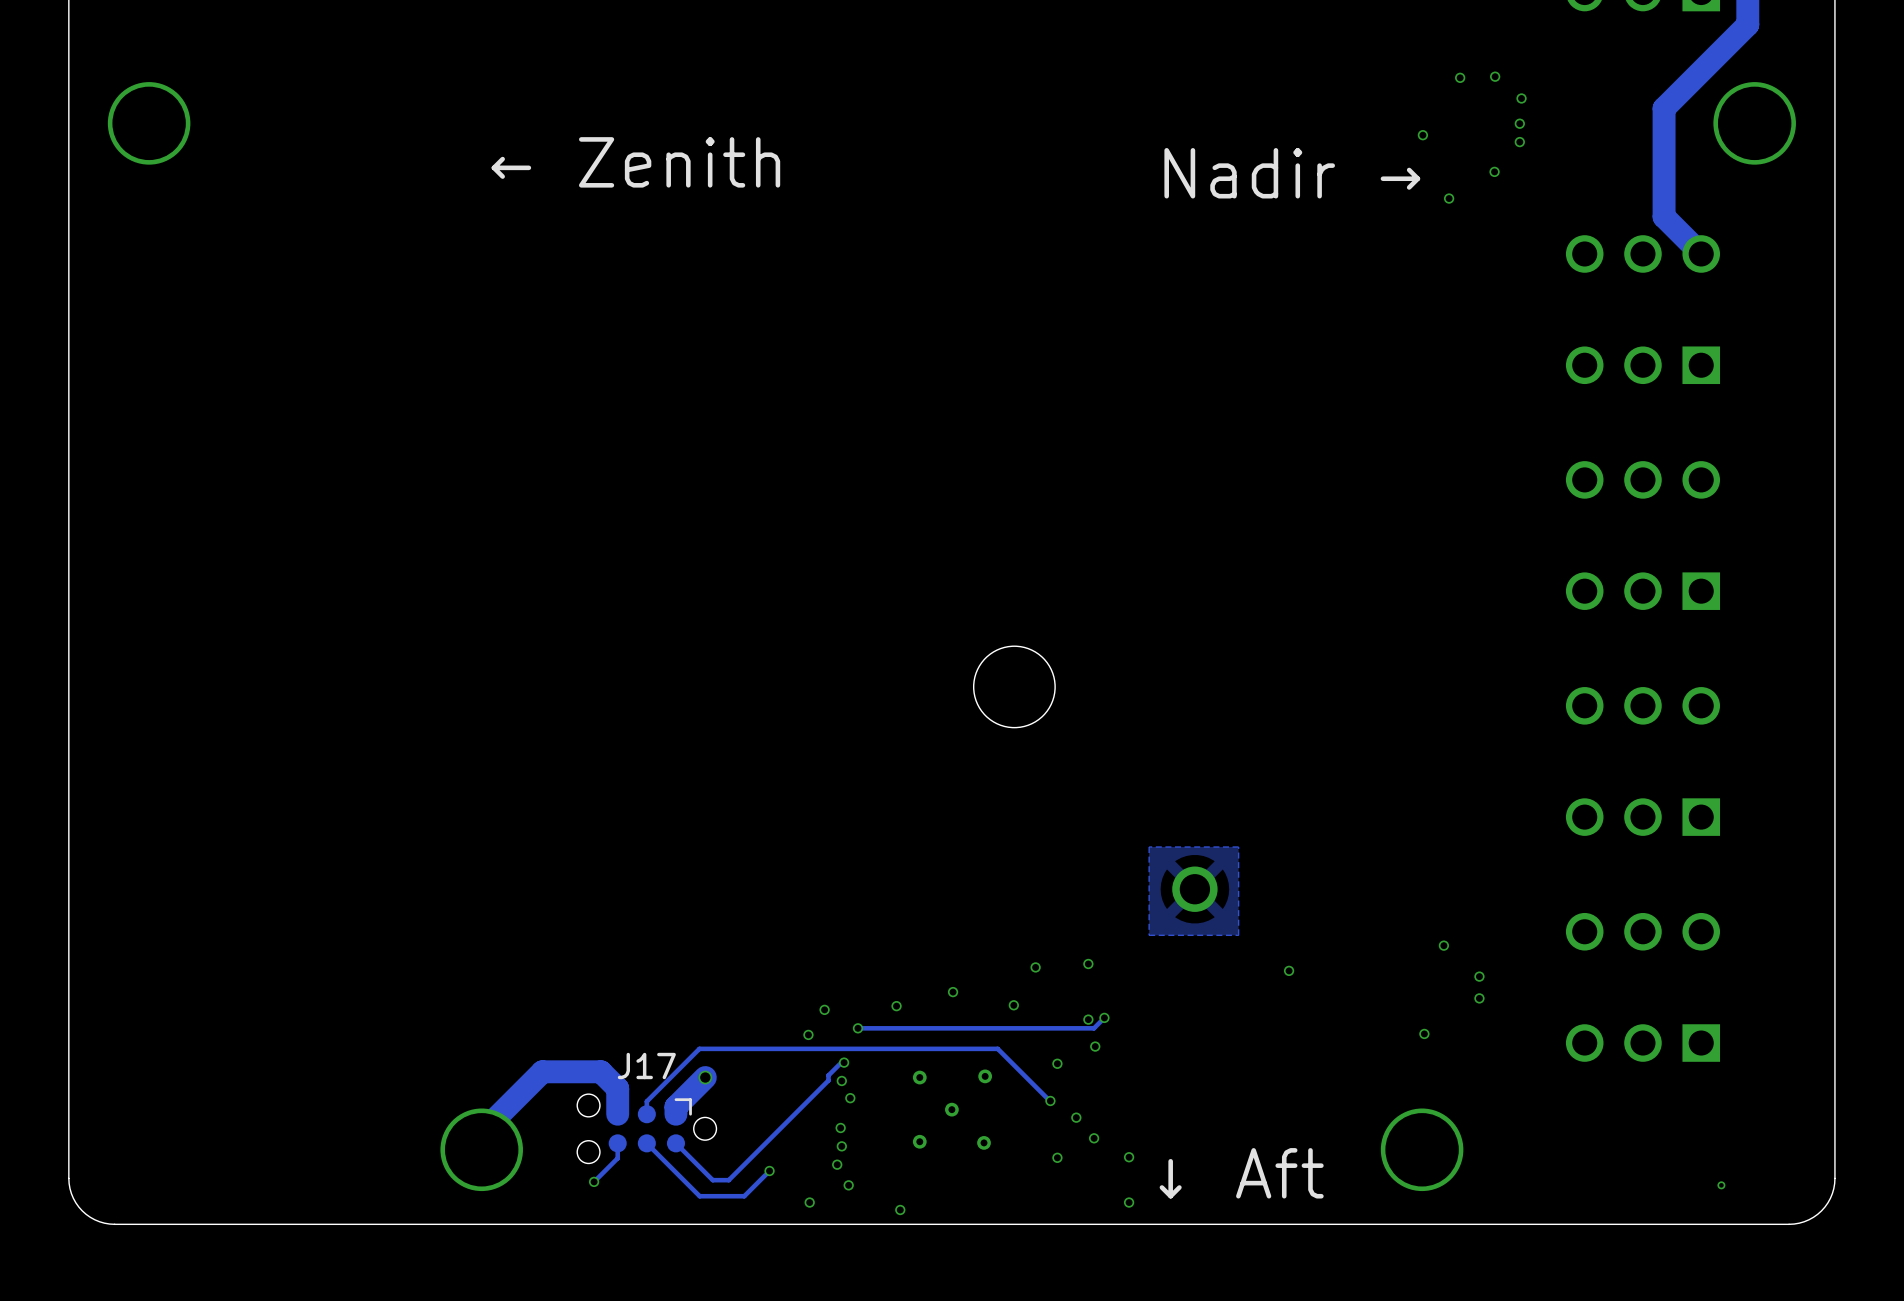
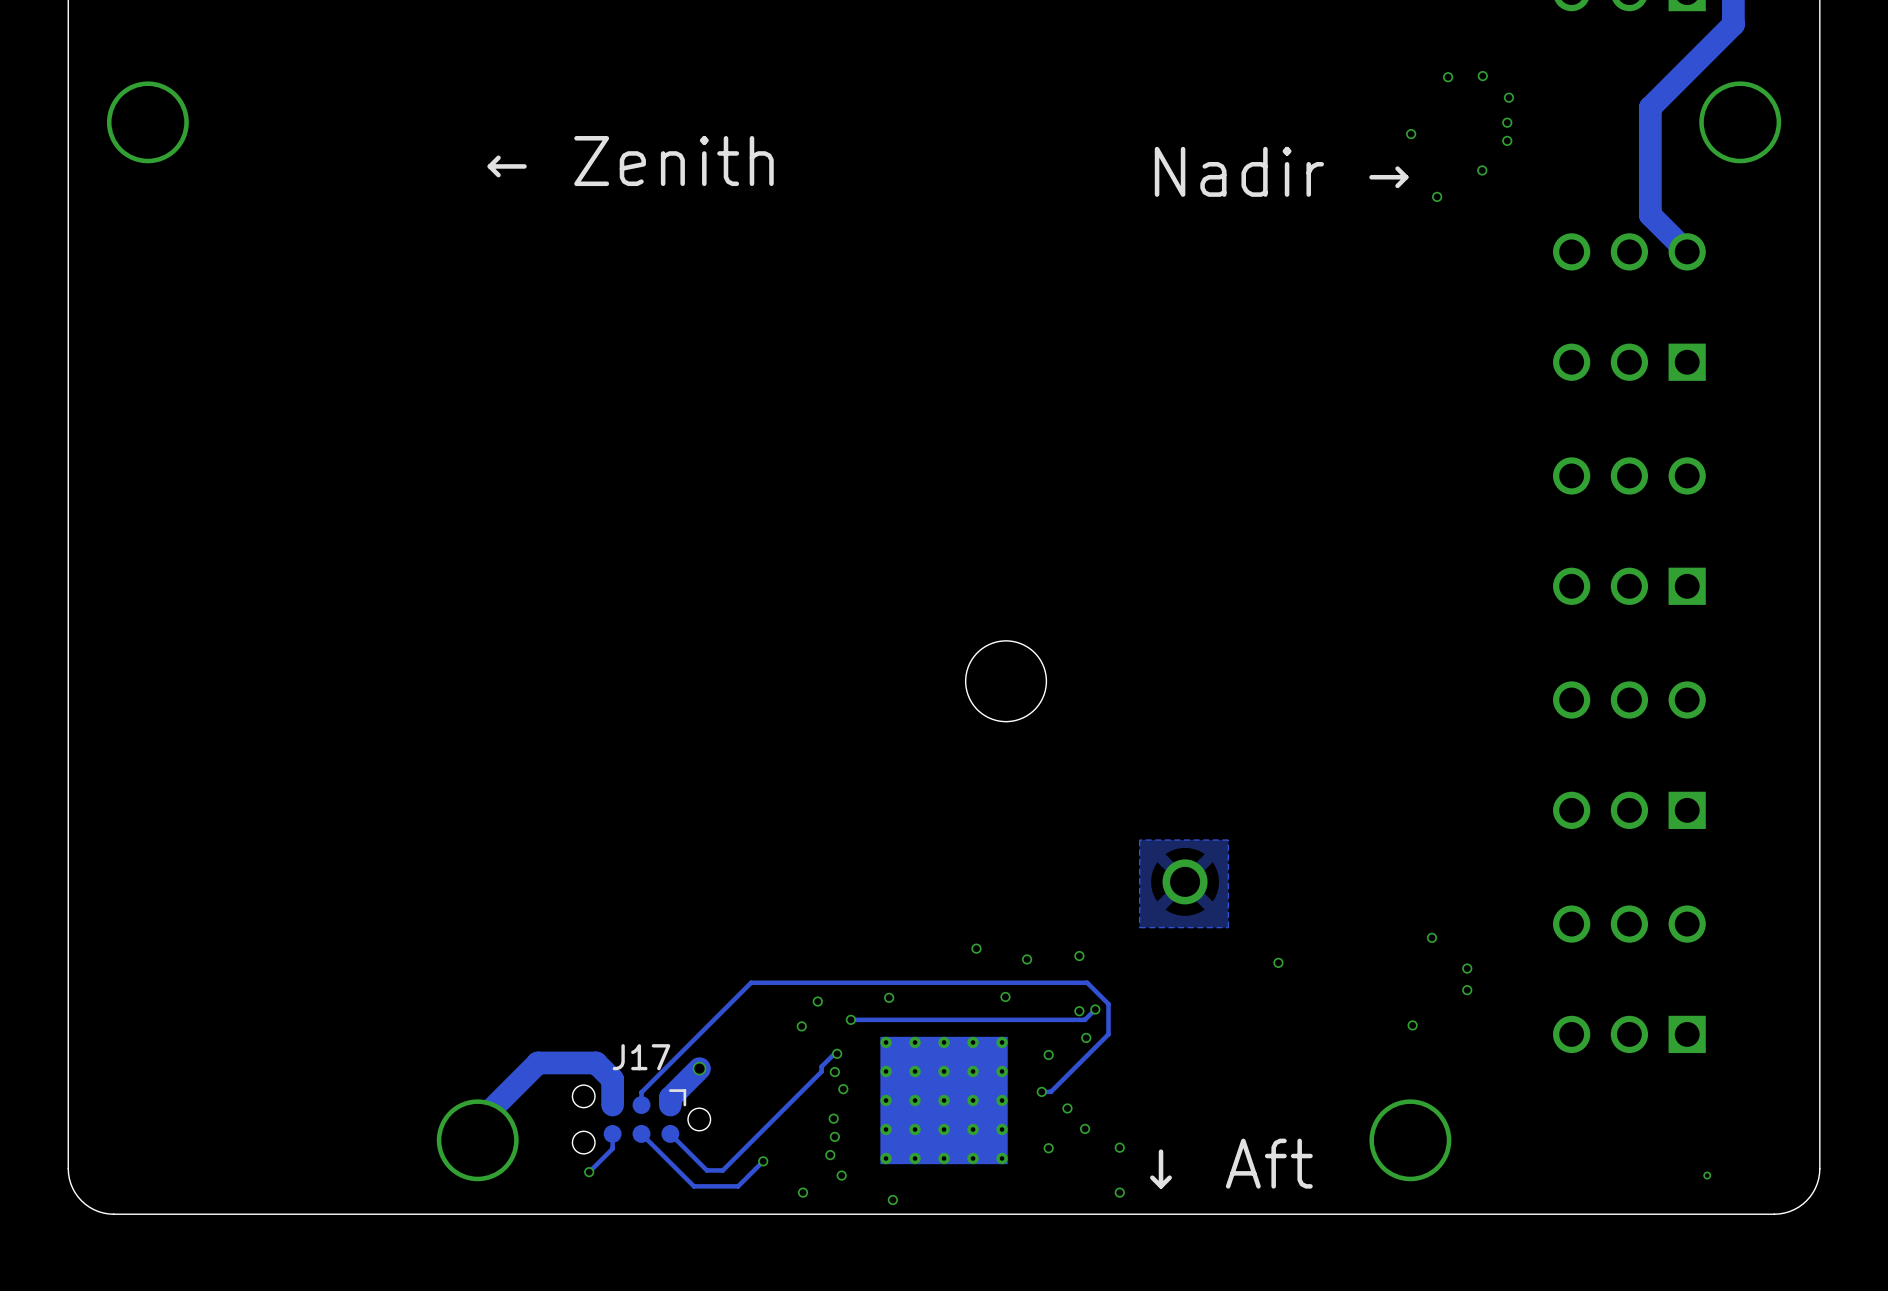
via position: (953, 992) -> (976, 948)
track: (699, 1048) (997, 1048) (1050, 1100) -> (693, 1040) (751, 982) (1087, 982) (1108, 1004) (1108, 1034) (1050, 1091) (1041, 1091)
via: (985, 1076) -> none
via: (919, 1077) -> none
via: (951, 1109) -> none
part: none -> (944, 1100)
via: (919, 1141) -> none
via: (984, 1142) -> none

